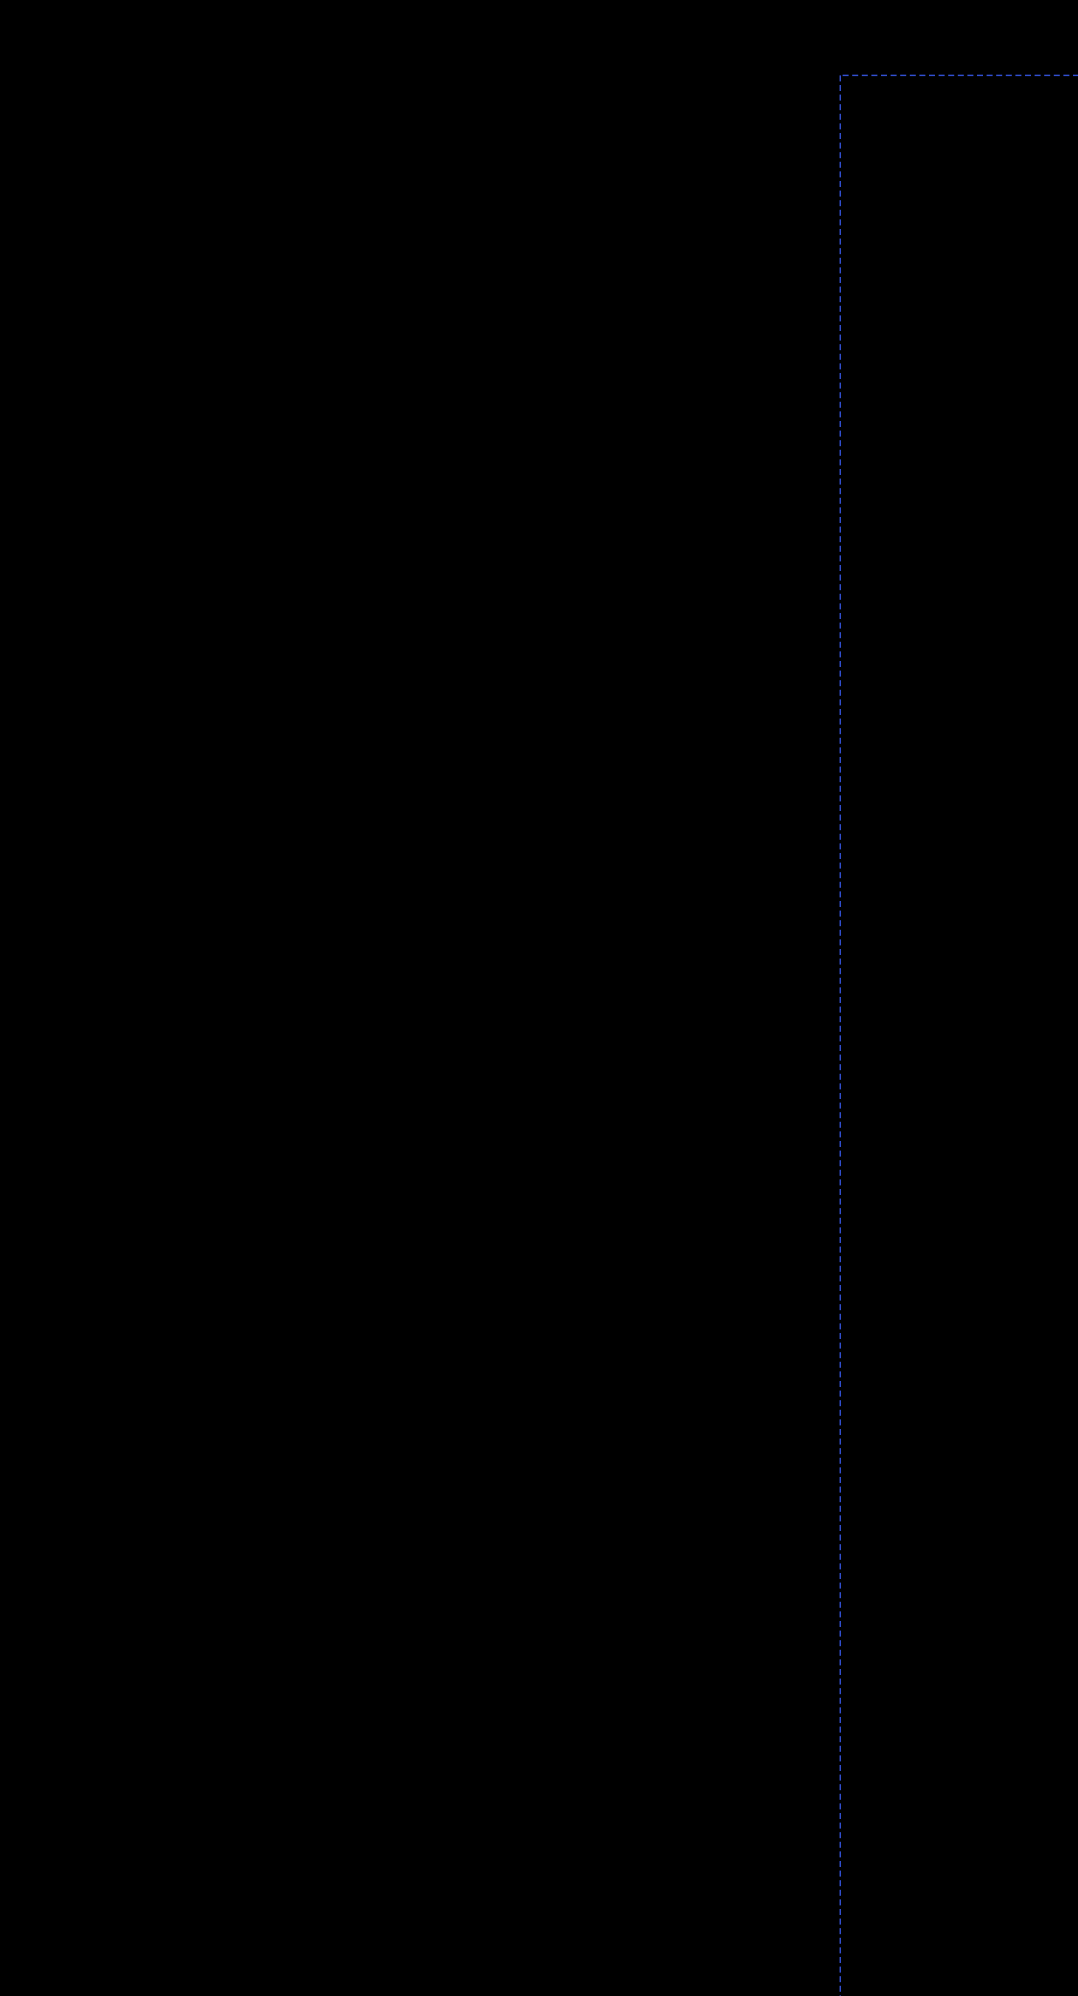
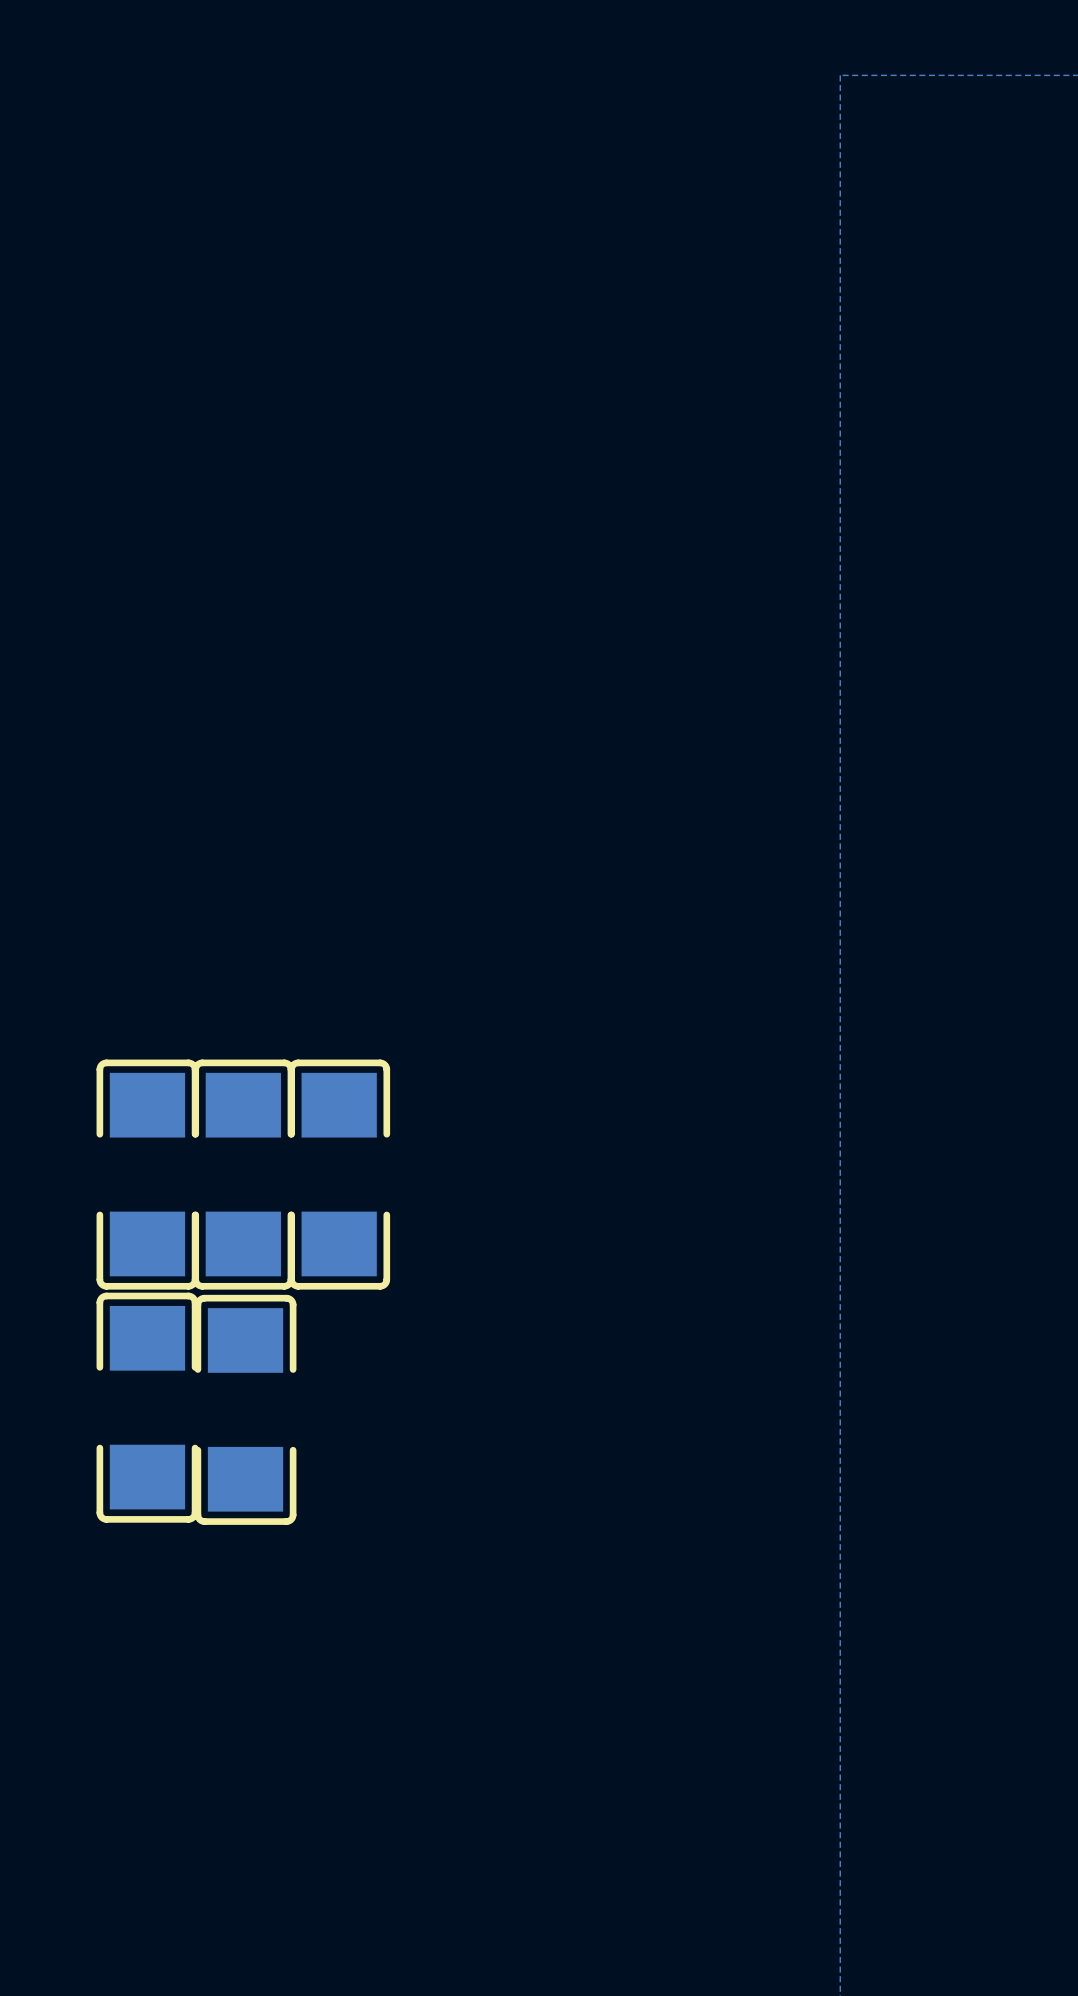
part: none -> (147, 1174)
part: none -> (243, 1174)
part: none -> (339, 1174)
part: none -> (147, 1407)
part: none -> (245, 1409)

